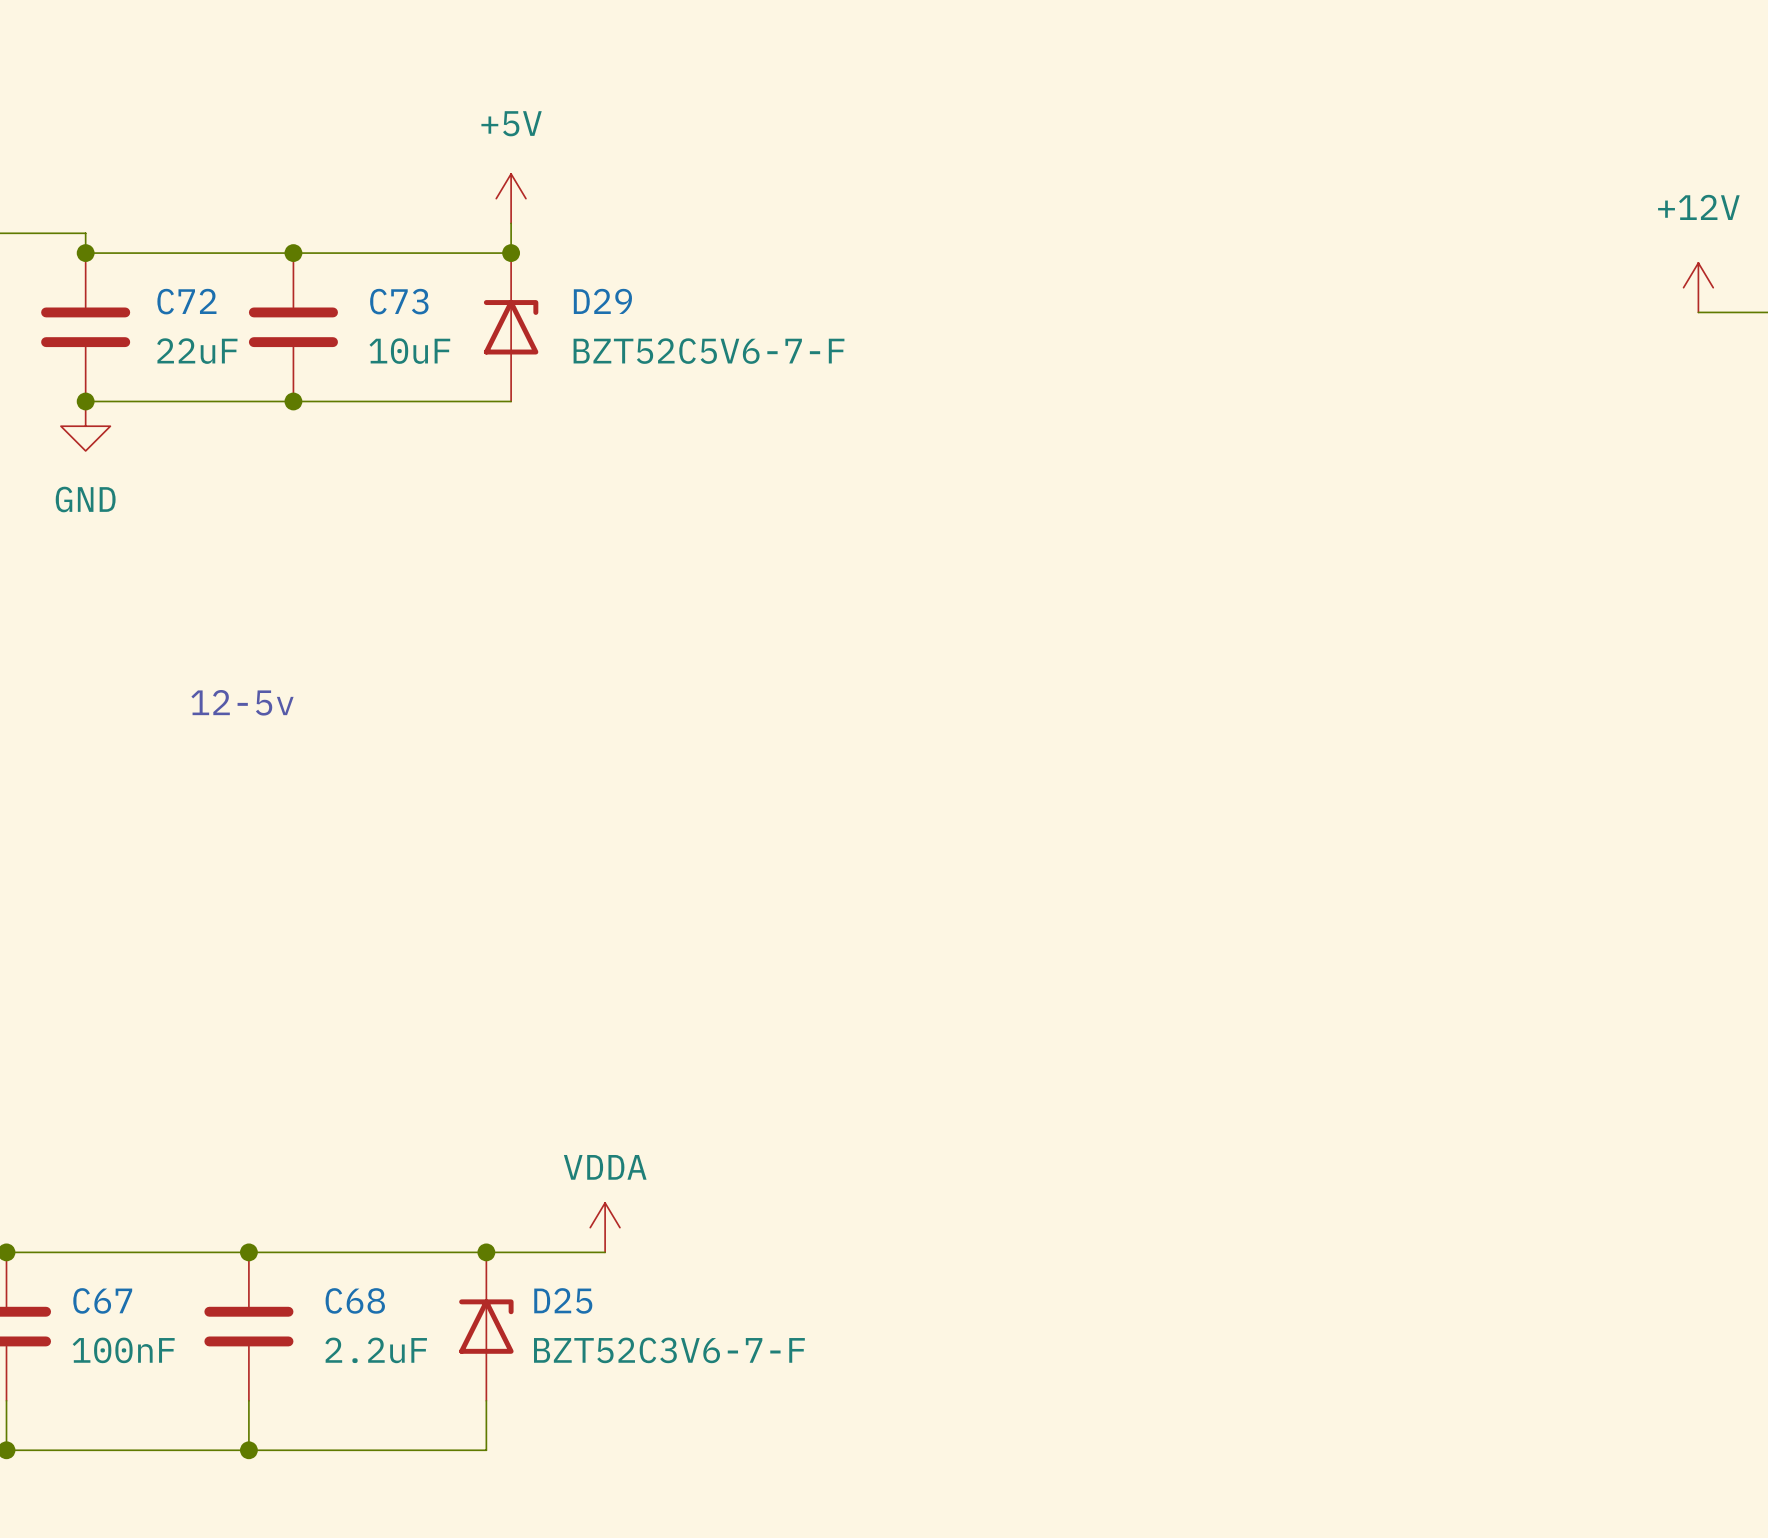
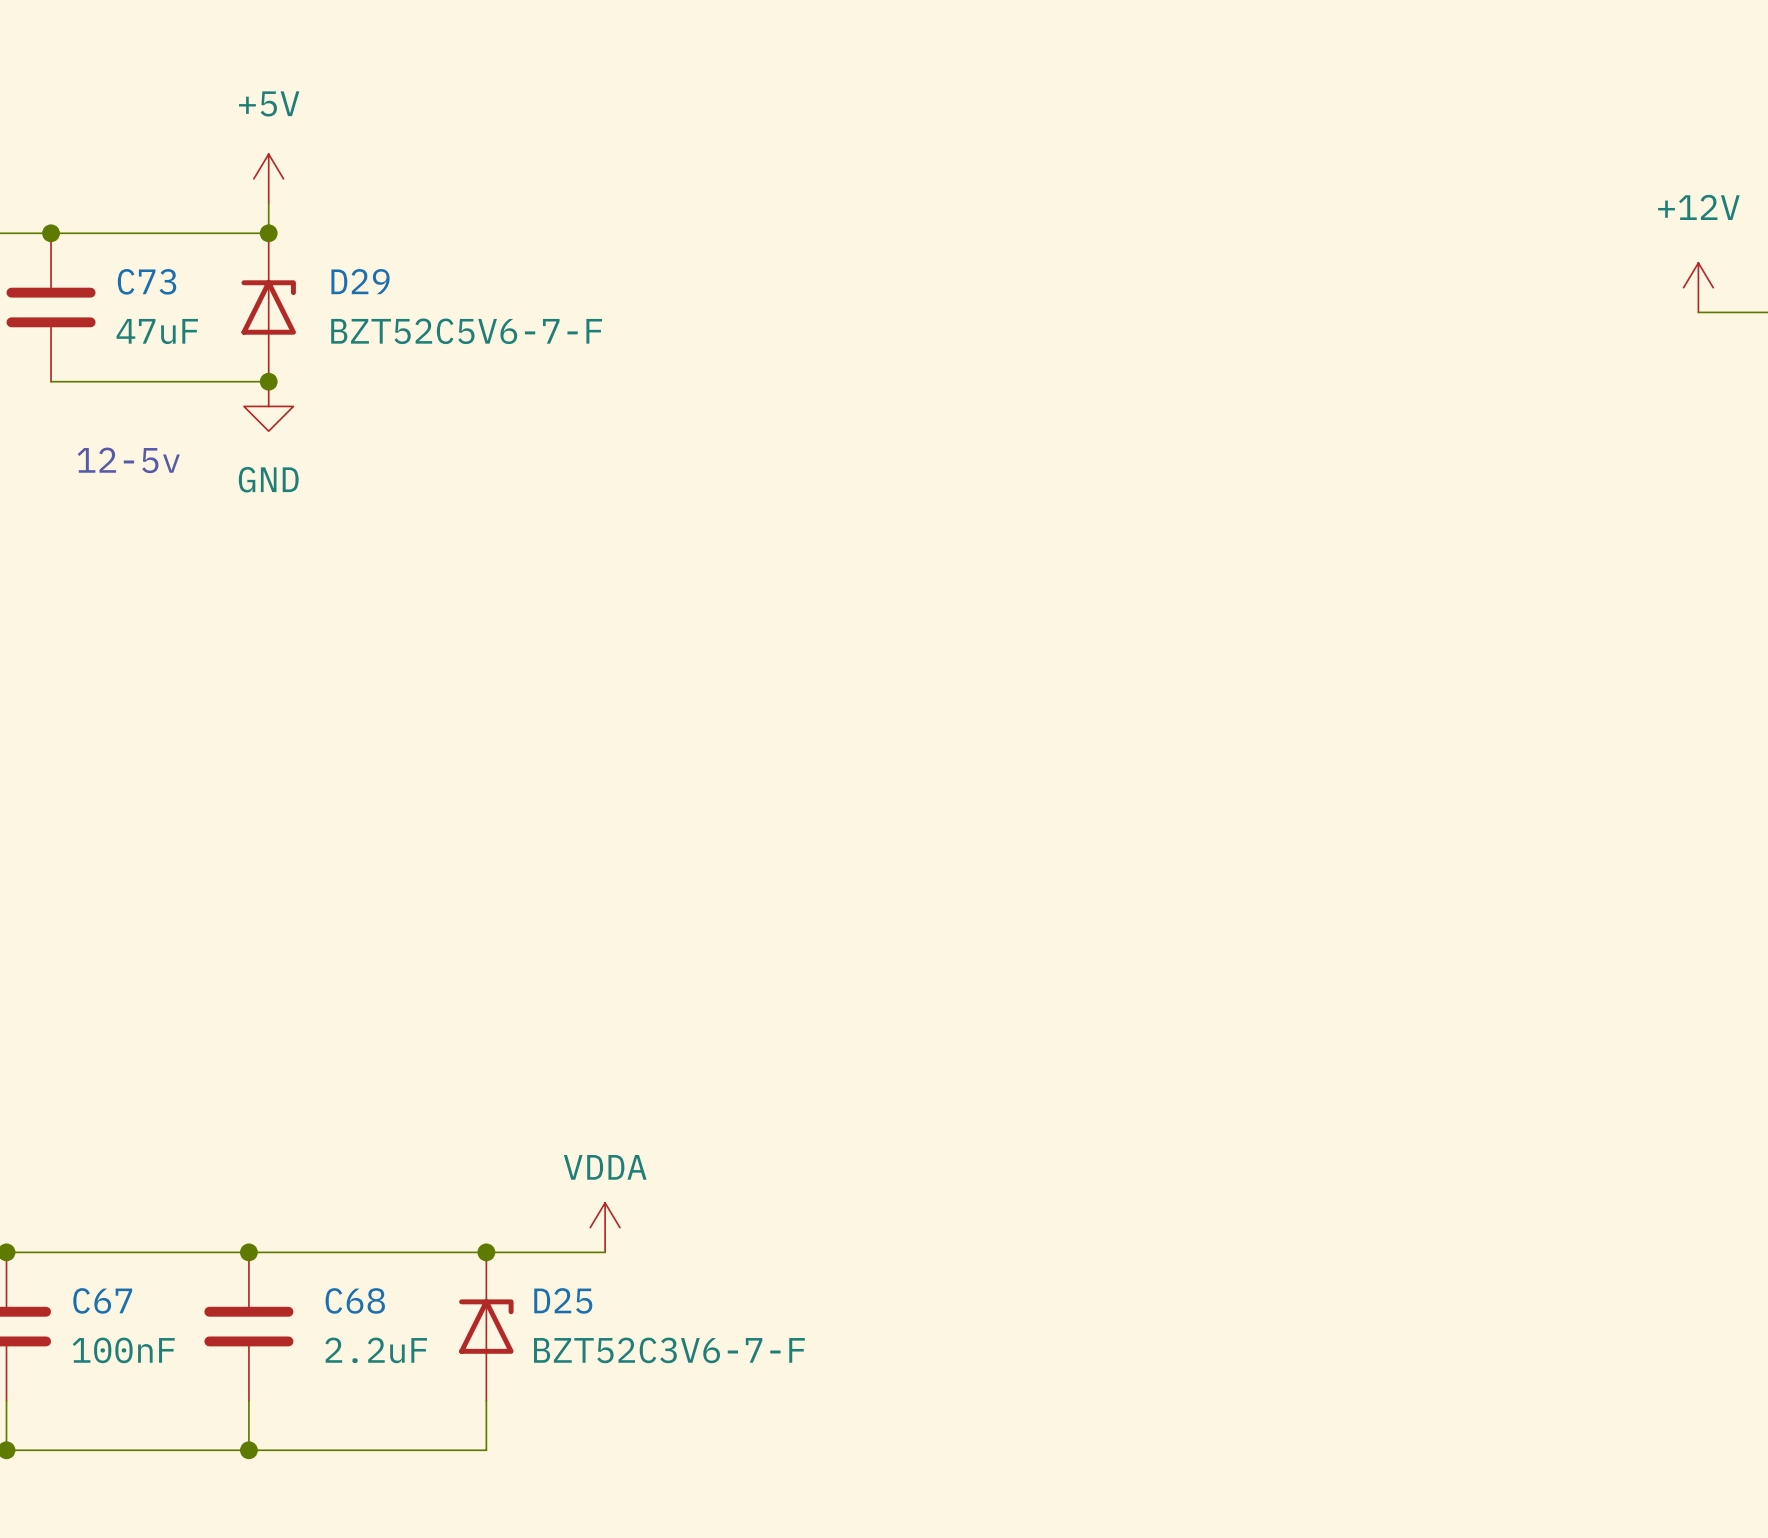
power symbol position: +5V (511, 198) -> +5V (268, 178)
wire: (511, 223) (511, 253) (85, 253) (85, 233) -> (268, 203) (268, 233) (85, 233)
junction: none -> (51, 233)
junction: (85, 253) -> none
junction position: (293, 253) -> (268, 233)
junction: (511, 253) -> none
C73 name position: C73 (399, 301) -> C73 (147, 281)
C72: 22uF (85, 327) -> none
C73 position: (293, 327) -> (51, 307)
D29 position: (511, 327) -> (268, 307)
C73 value: 10uF (409, 351) -> 47uF (157, 331)
wire: none -> (51, 381) (268, 381)
wire: (85, 401) (511, 401) -> none
junction: (85, 401) -> none
junction position: (293, 401) -> (268, 381)
power symbol position: GND (85, 426) -> GND (268, 406)
text position: 12-5v (242, 702) -> 12-5v (128, 460)

